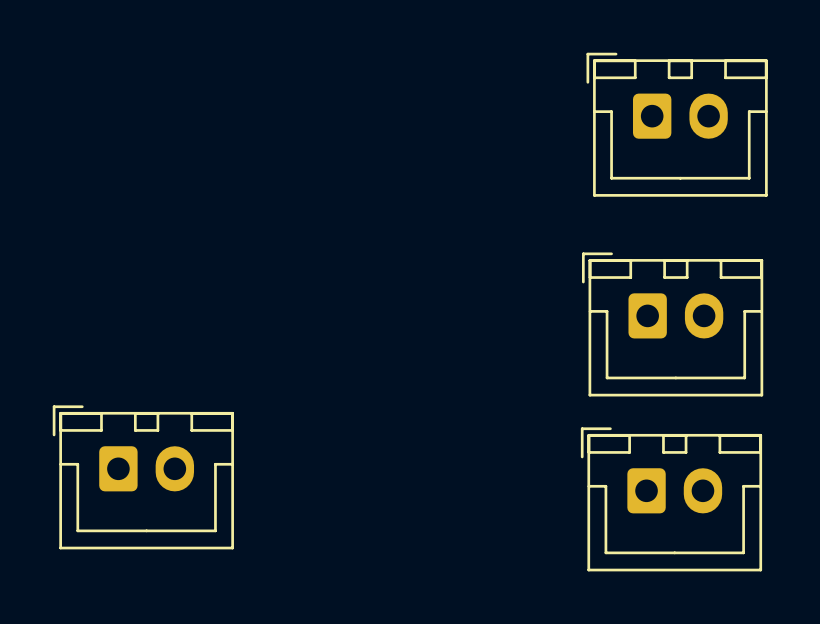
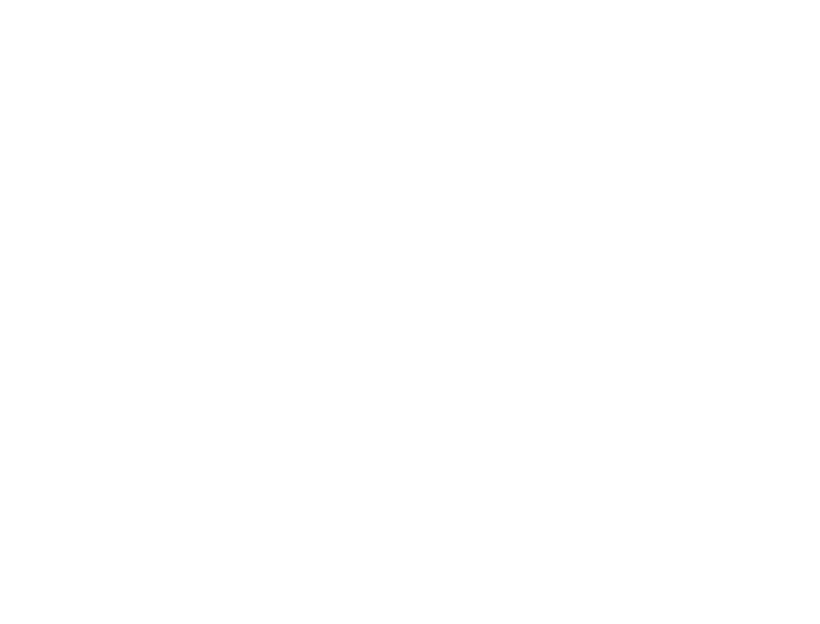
part: (677, 124) -> none
part: (672, 324) -> none
part: (143, 477) -> none
part: (671, 499) -> none

